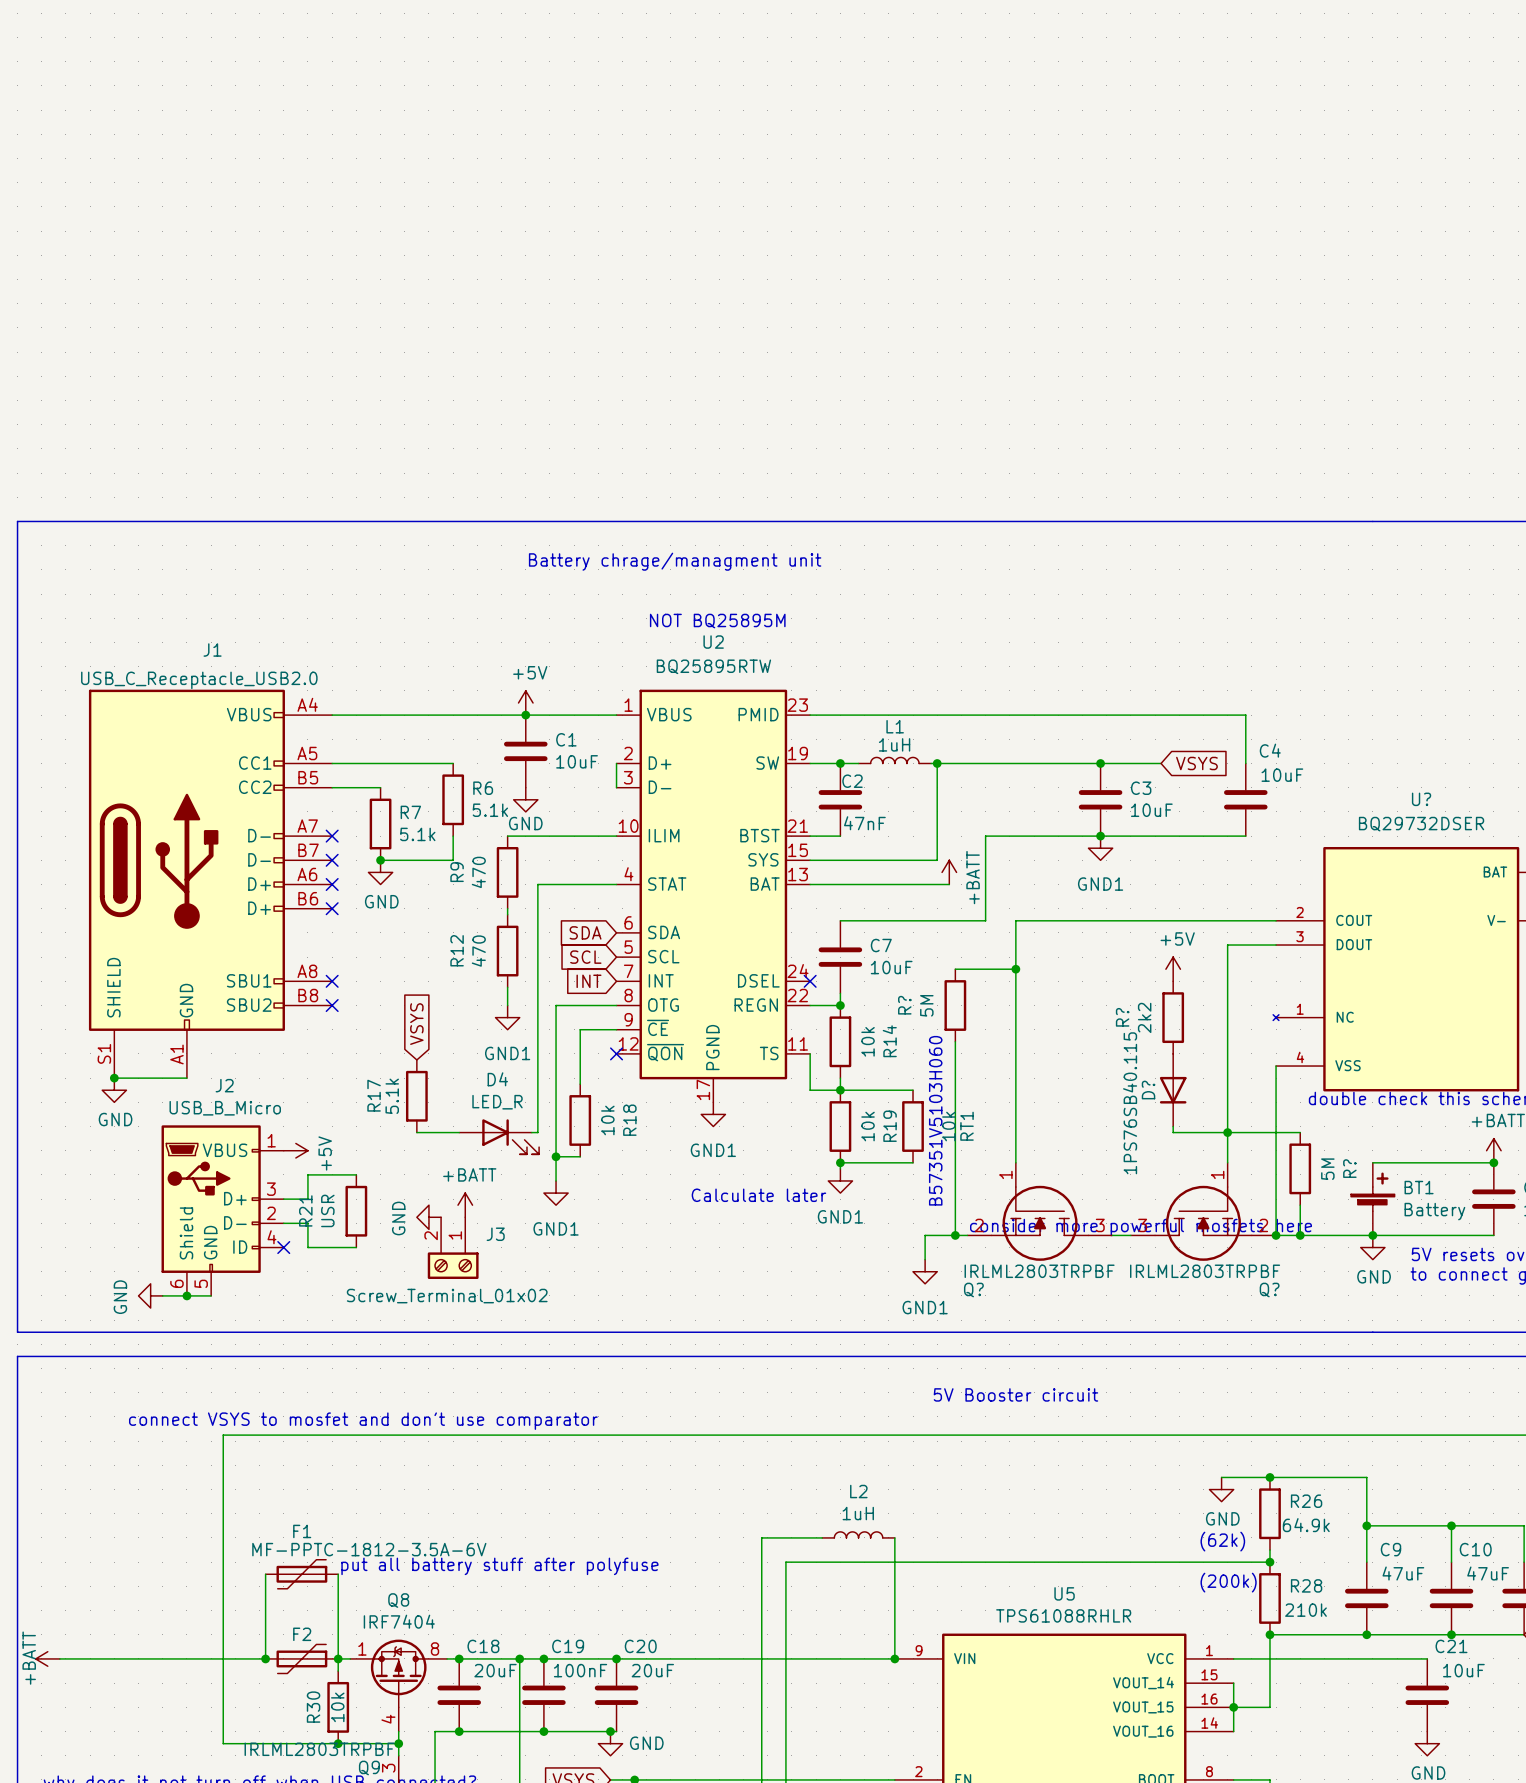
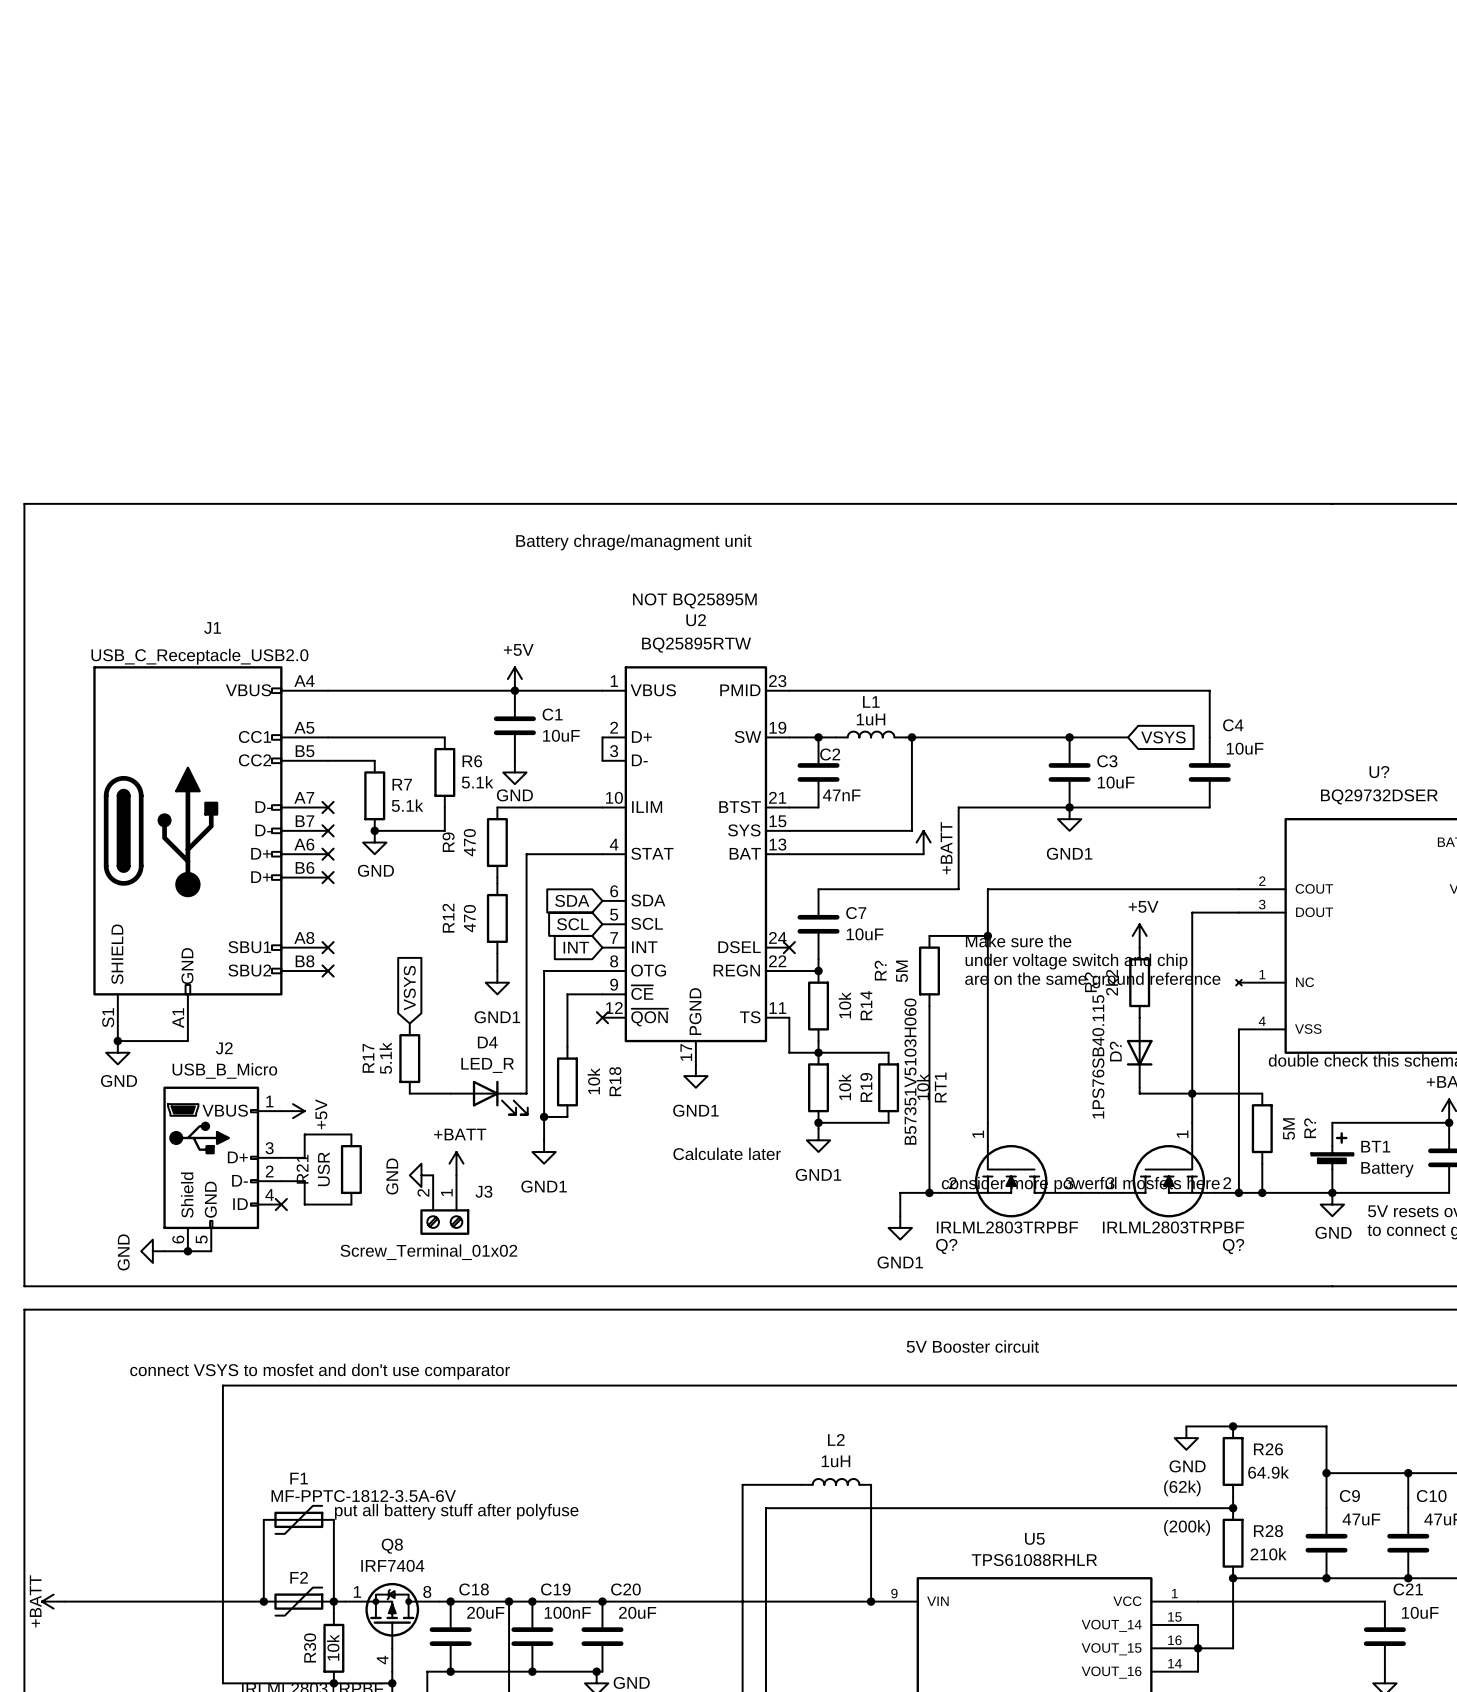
text: none -> Make sure the (1018, 941)
text: none -> under voltage switch and chip (1076, 961)
text: none -> are on the same ground reference (1092, 980)

